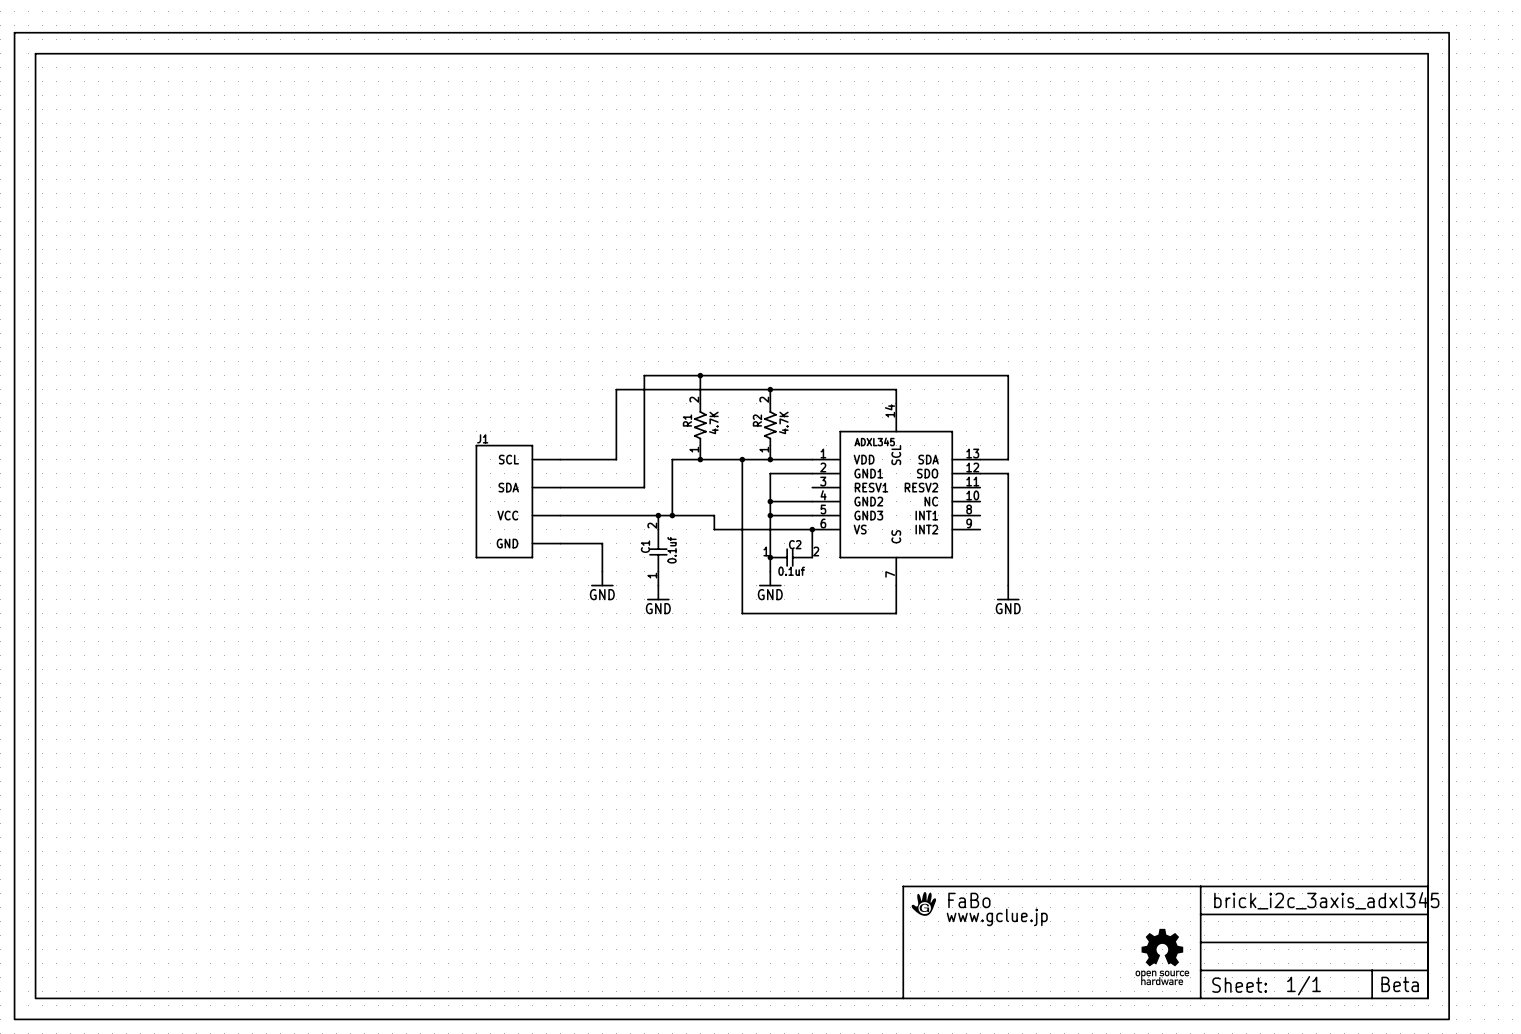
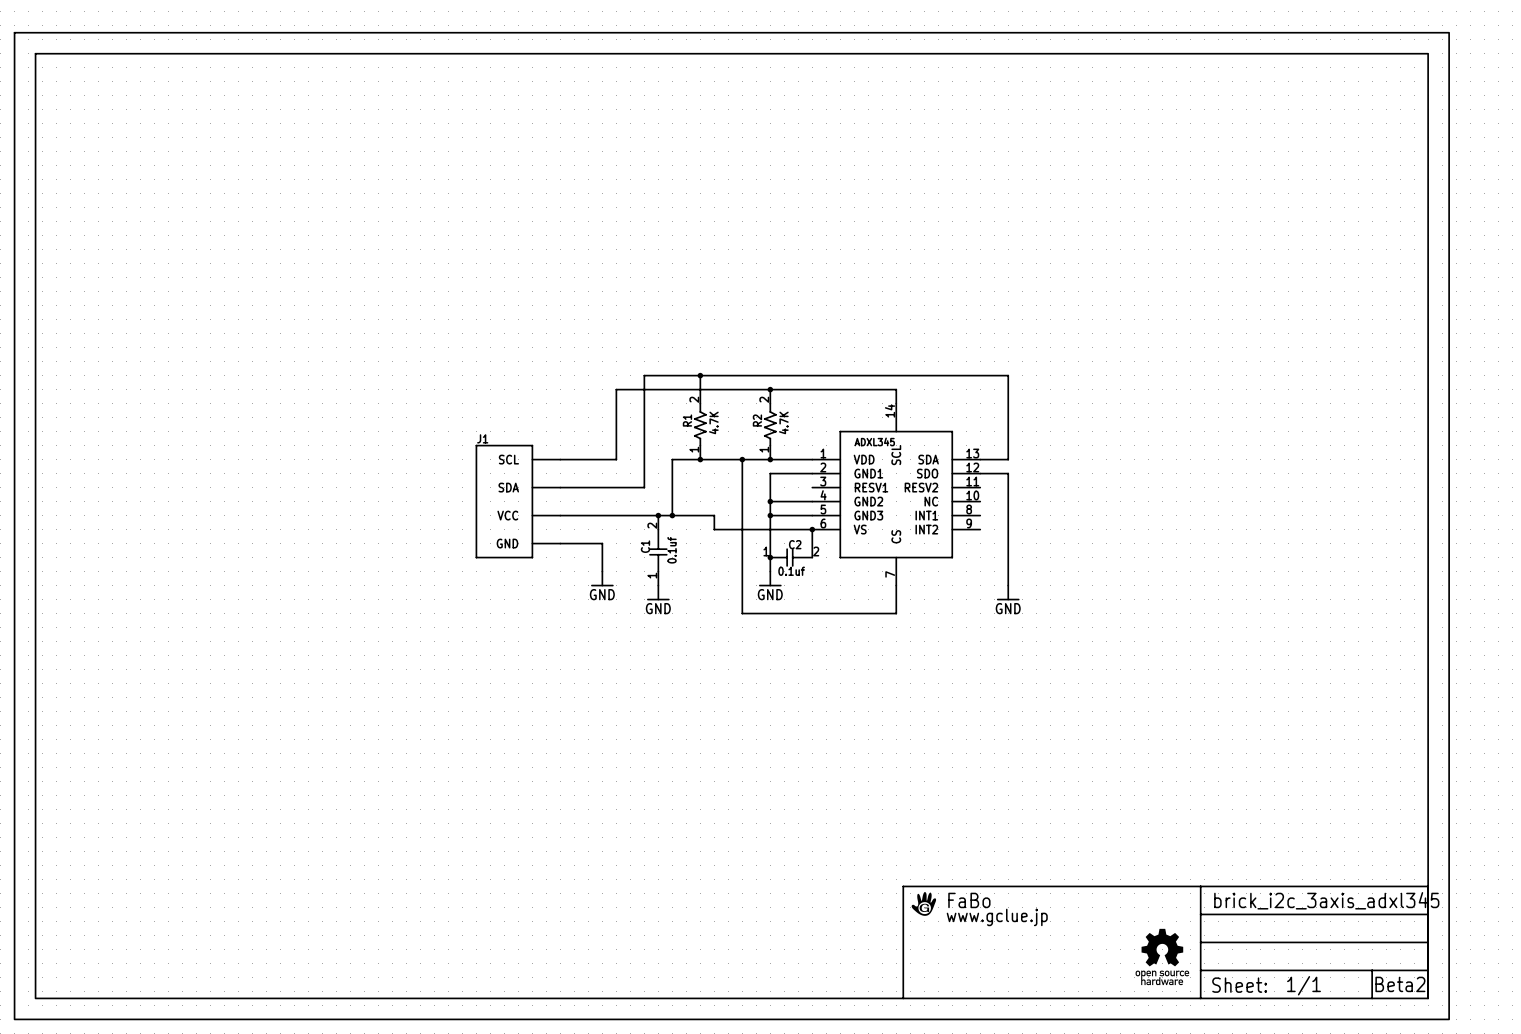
text: Beta (1400, 984) -> Beta2 (1400, 984)

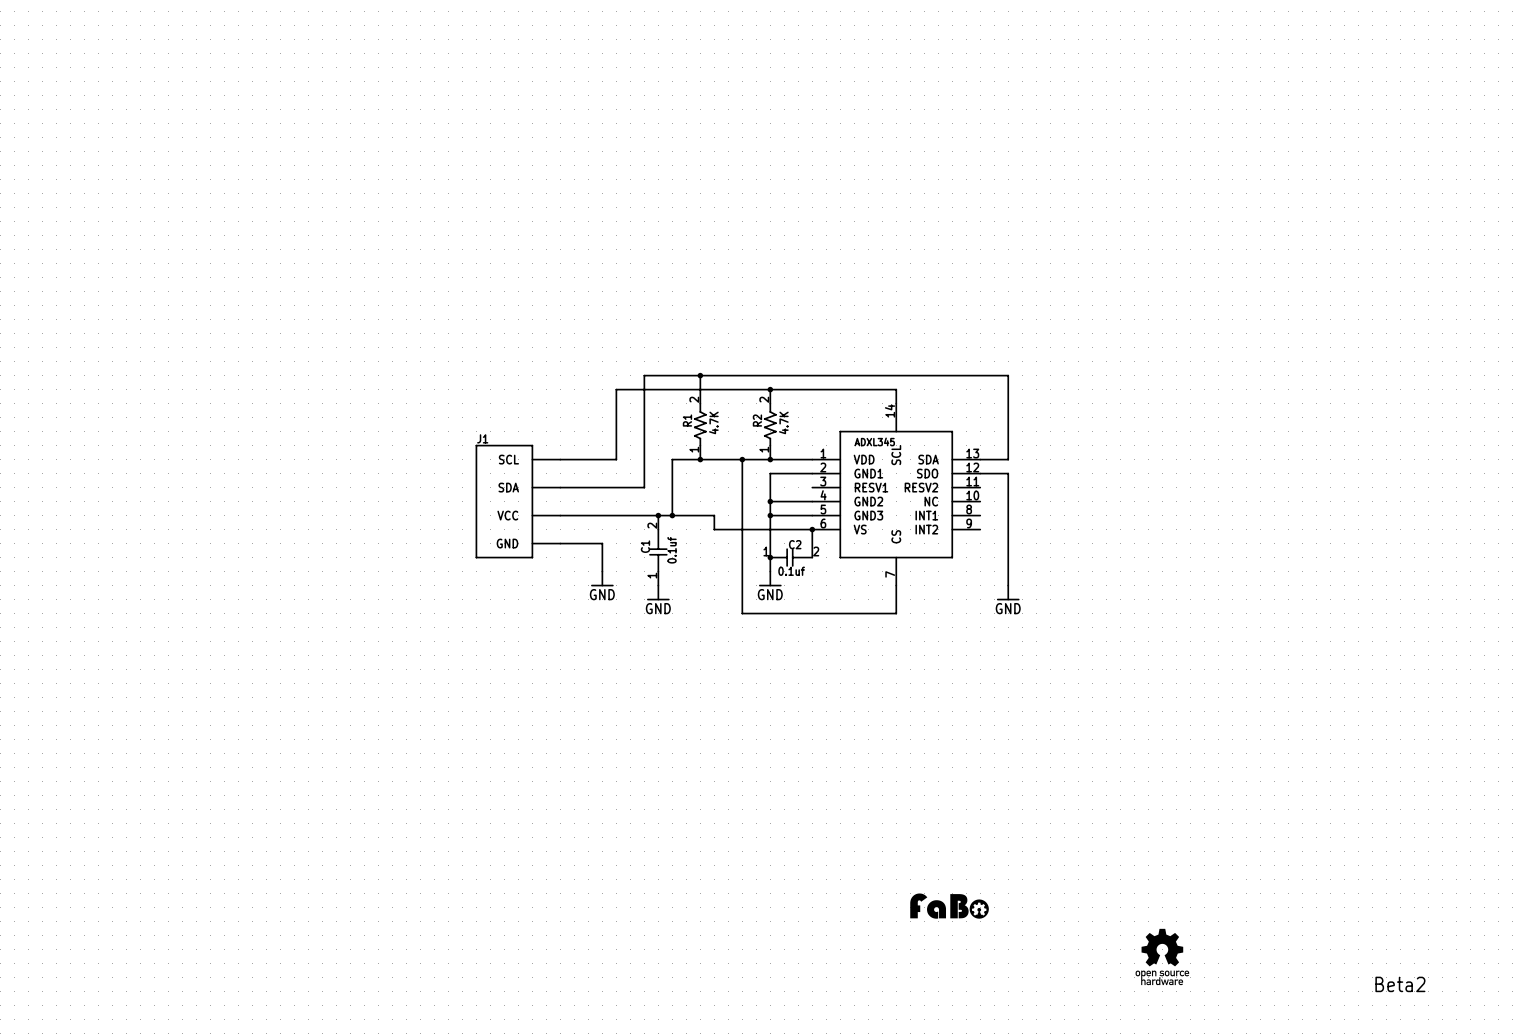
part: (731, 526) -> none
part: none -> (949, 906)

